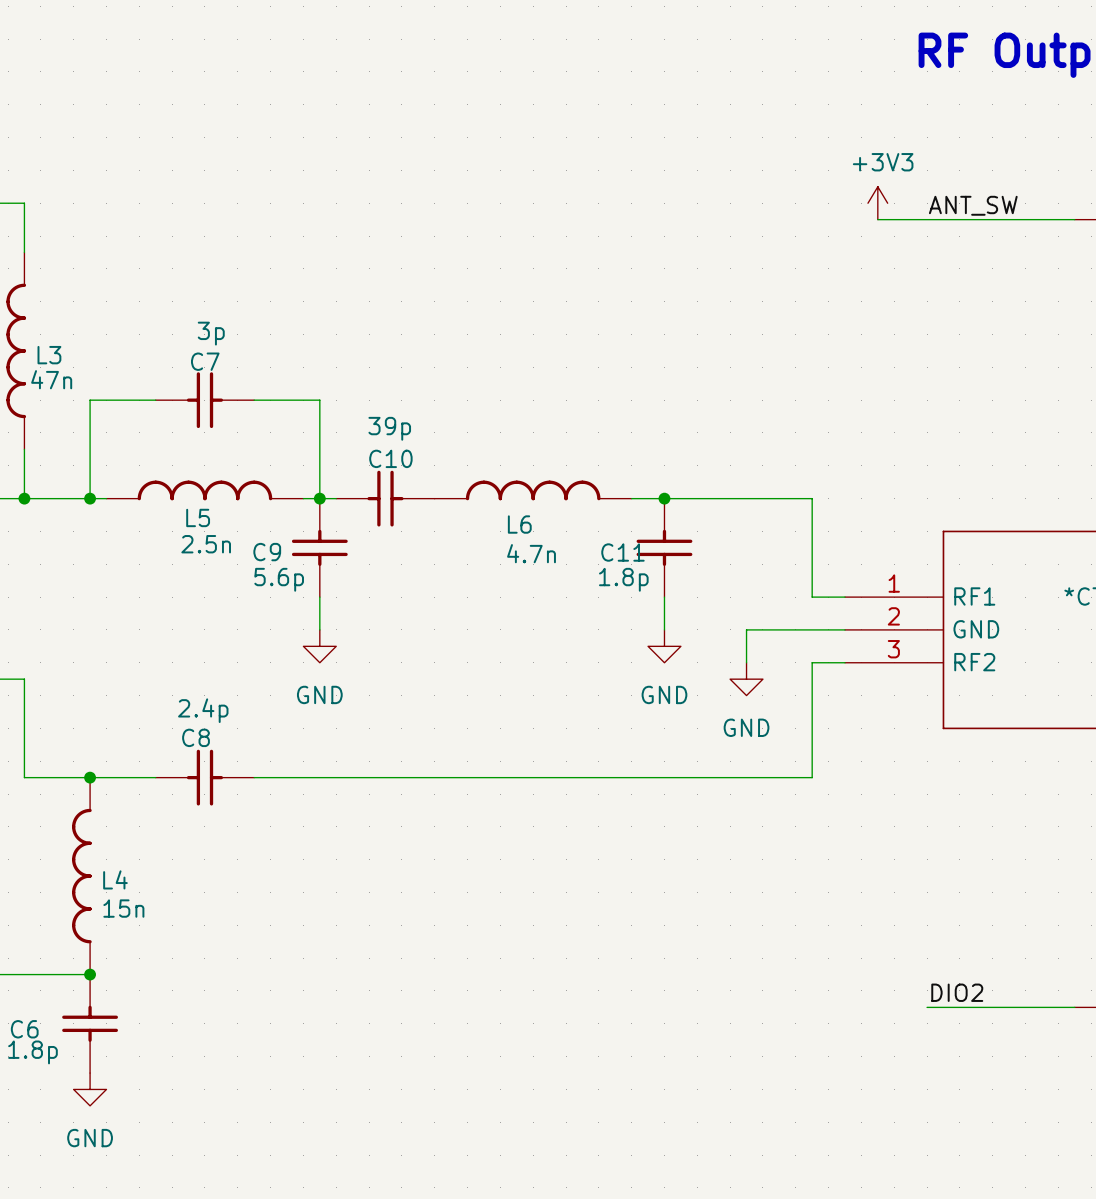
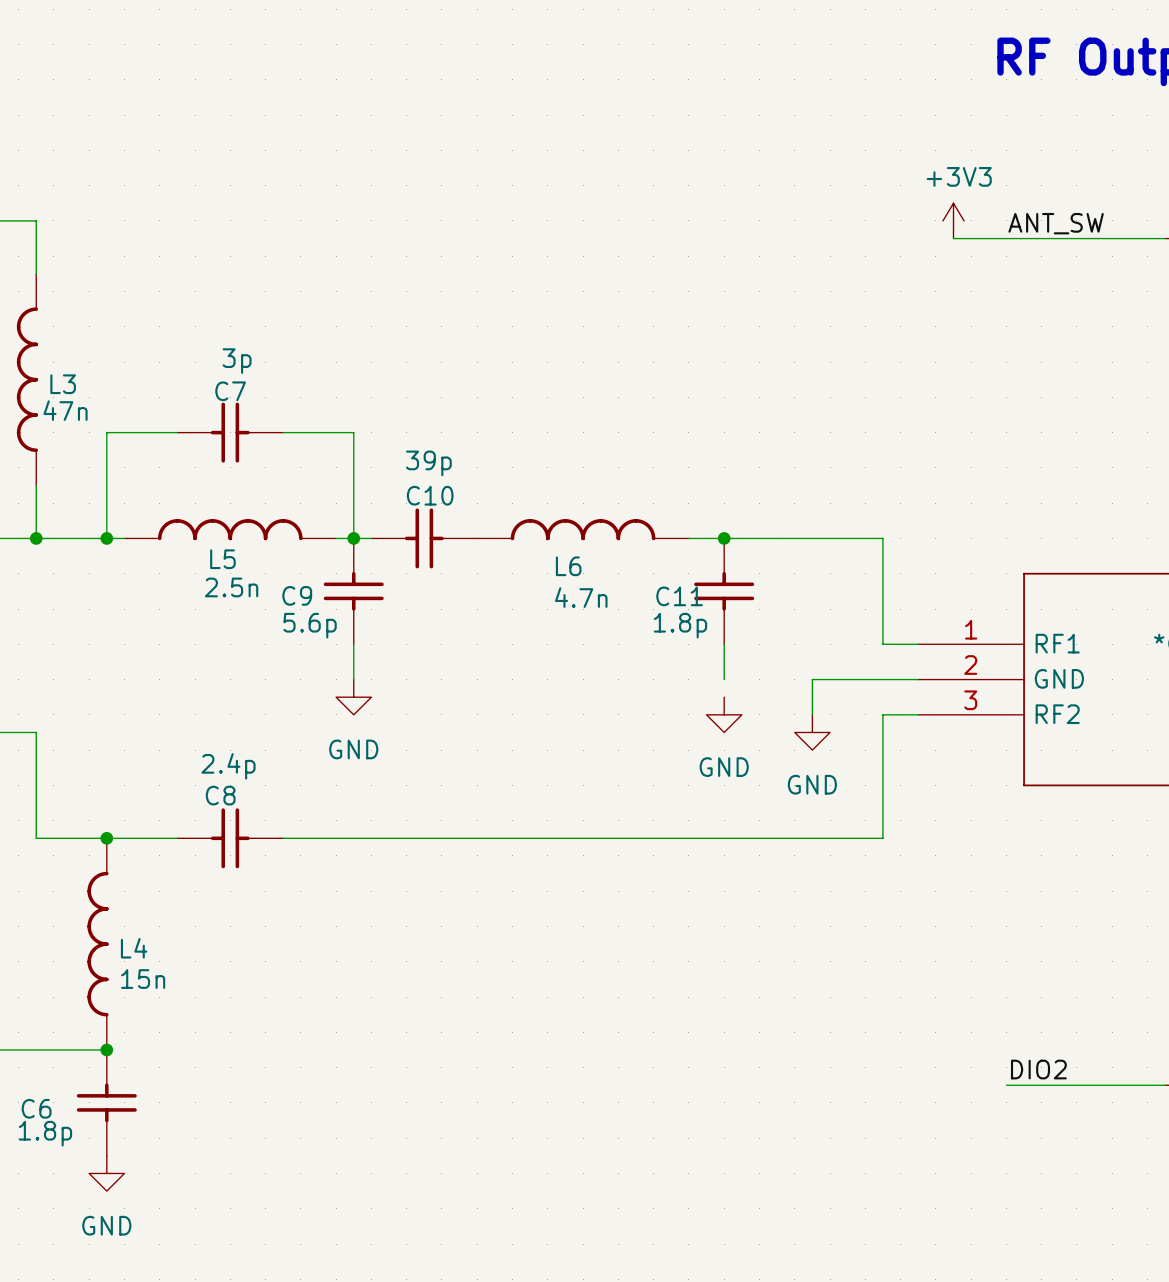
power symbol position: GND (664, 646) -> GND (724, 714)

